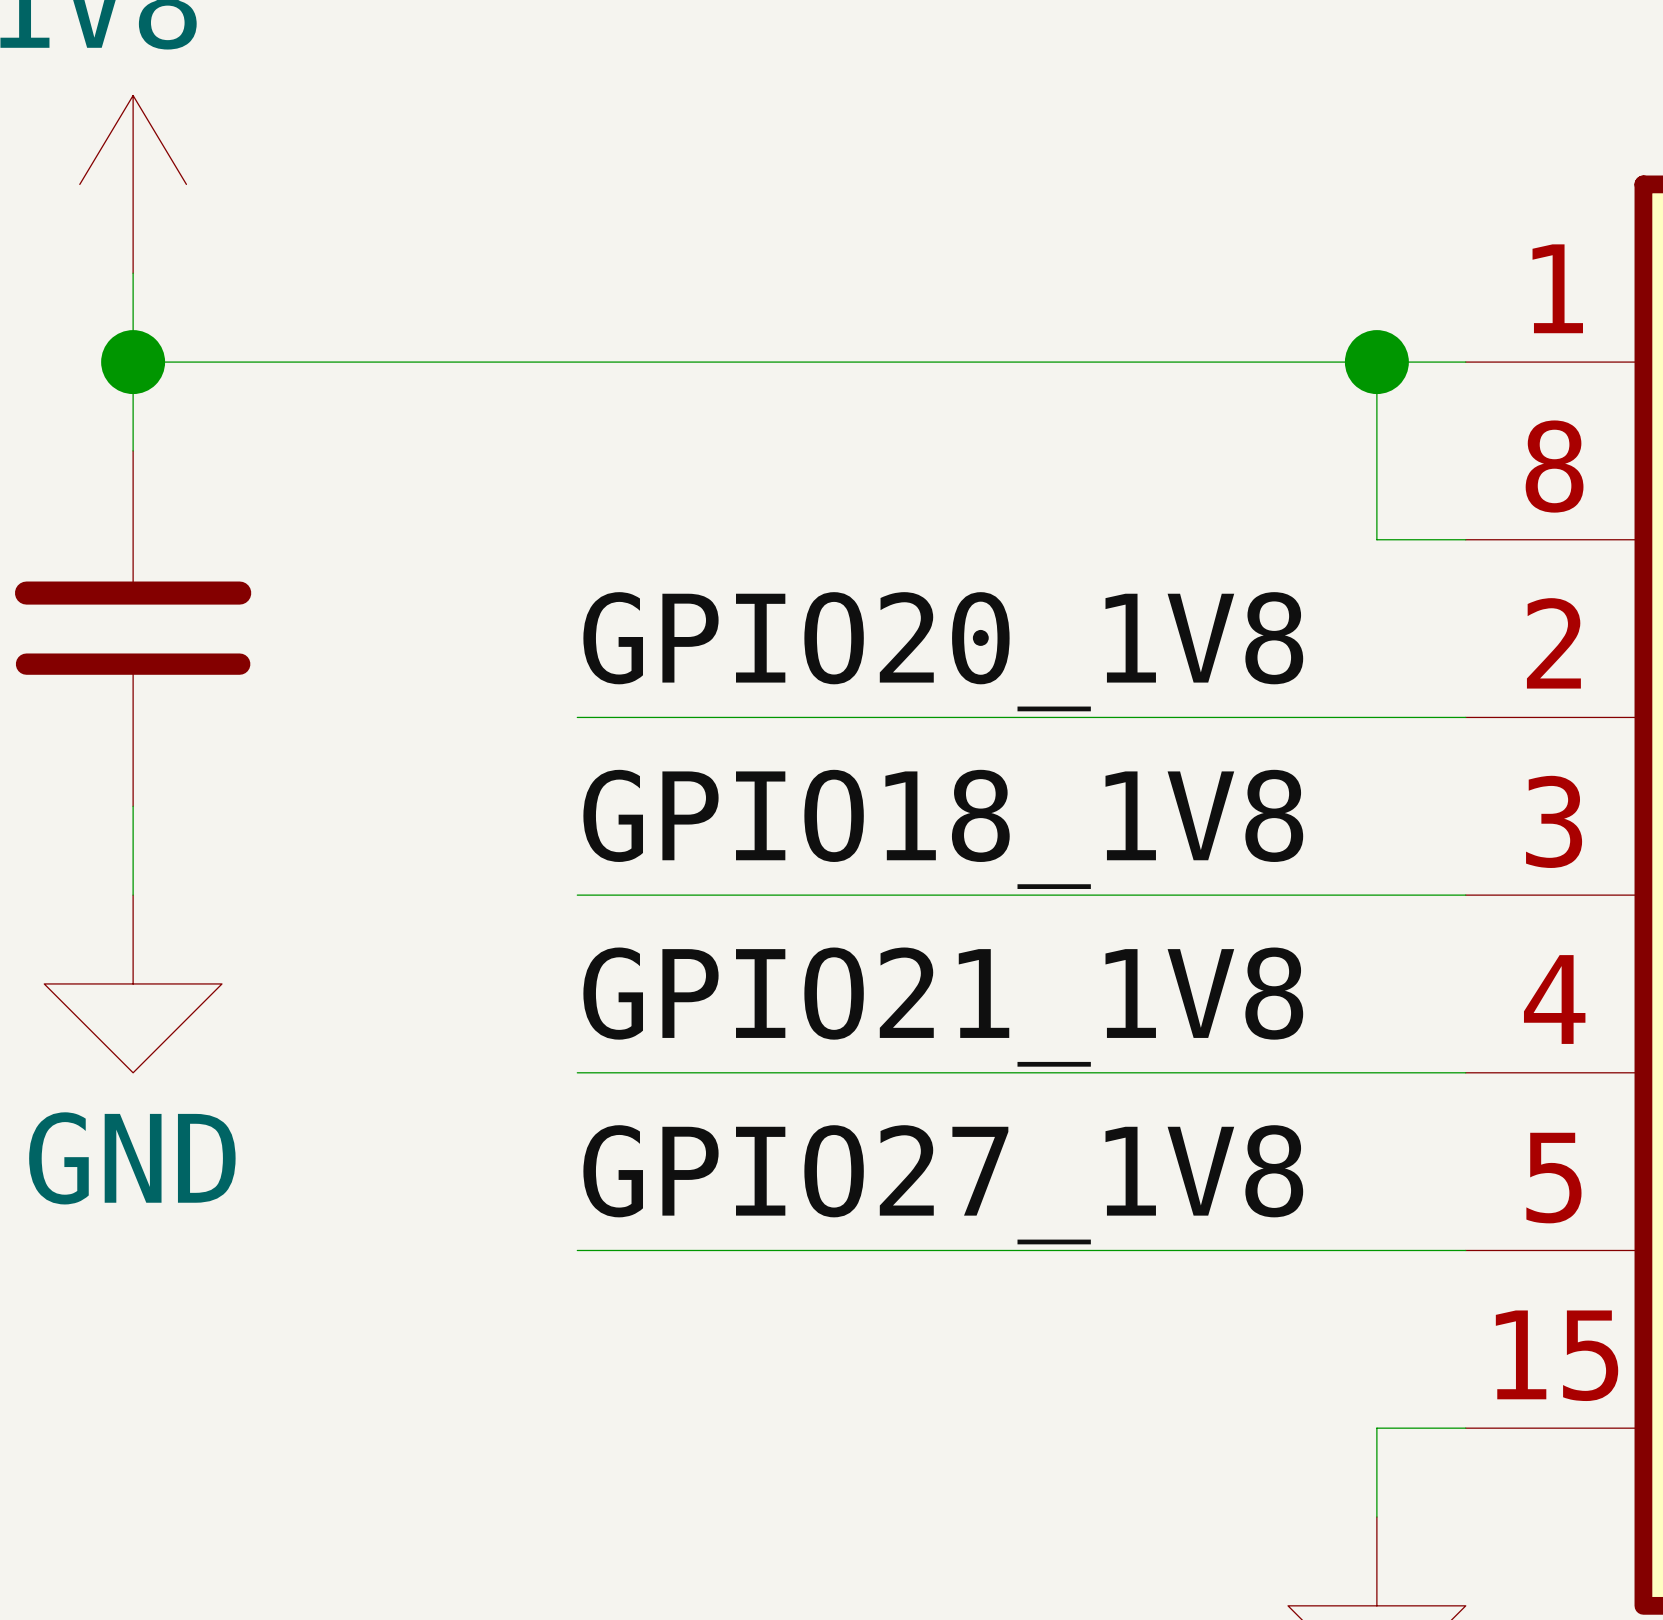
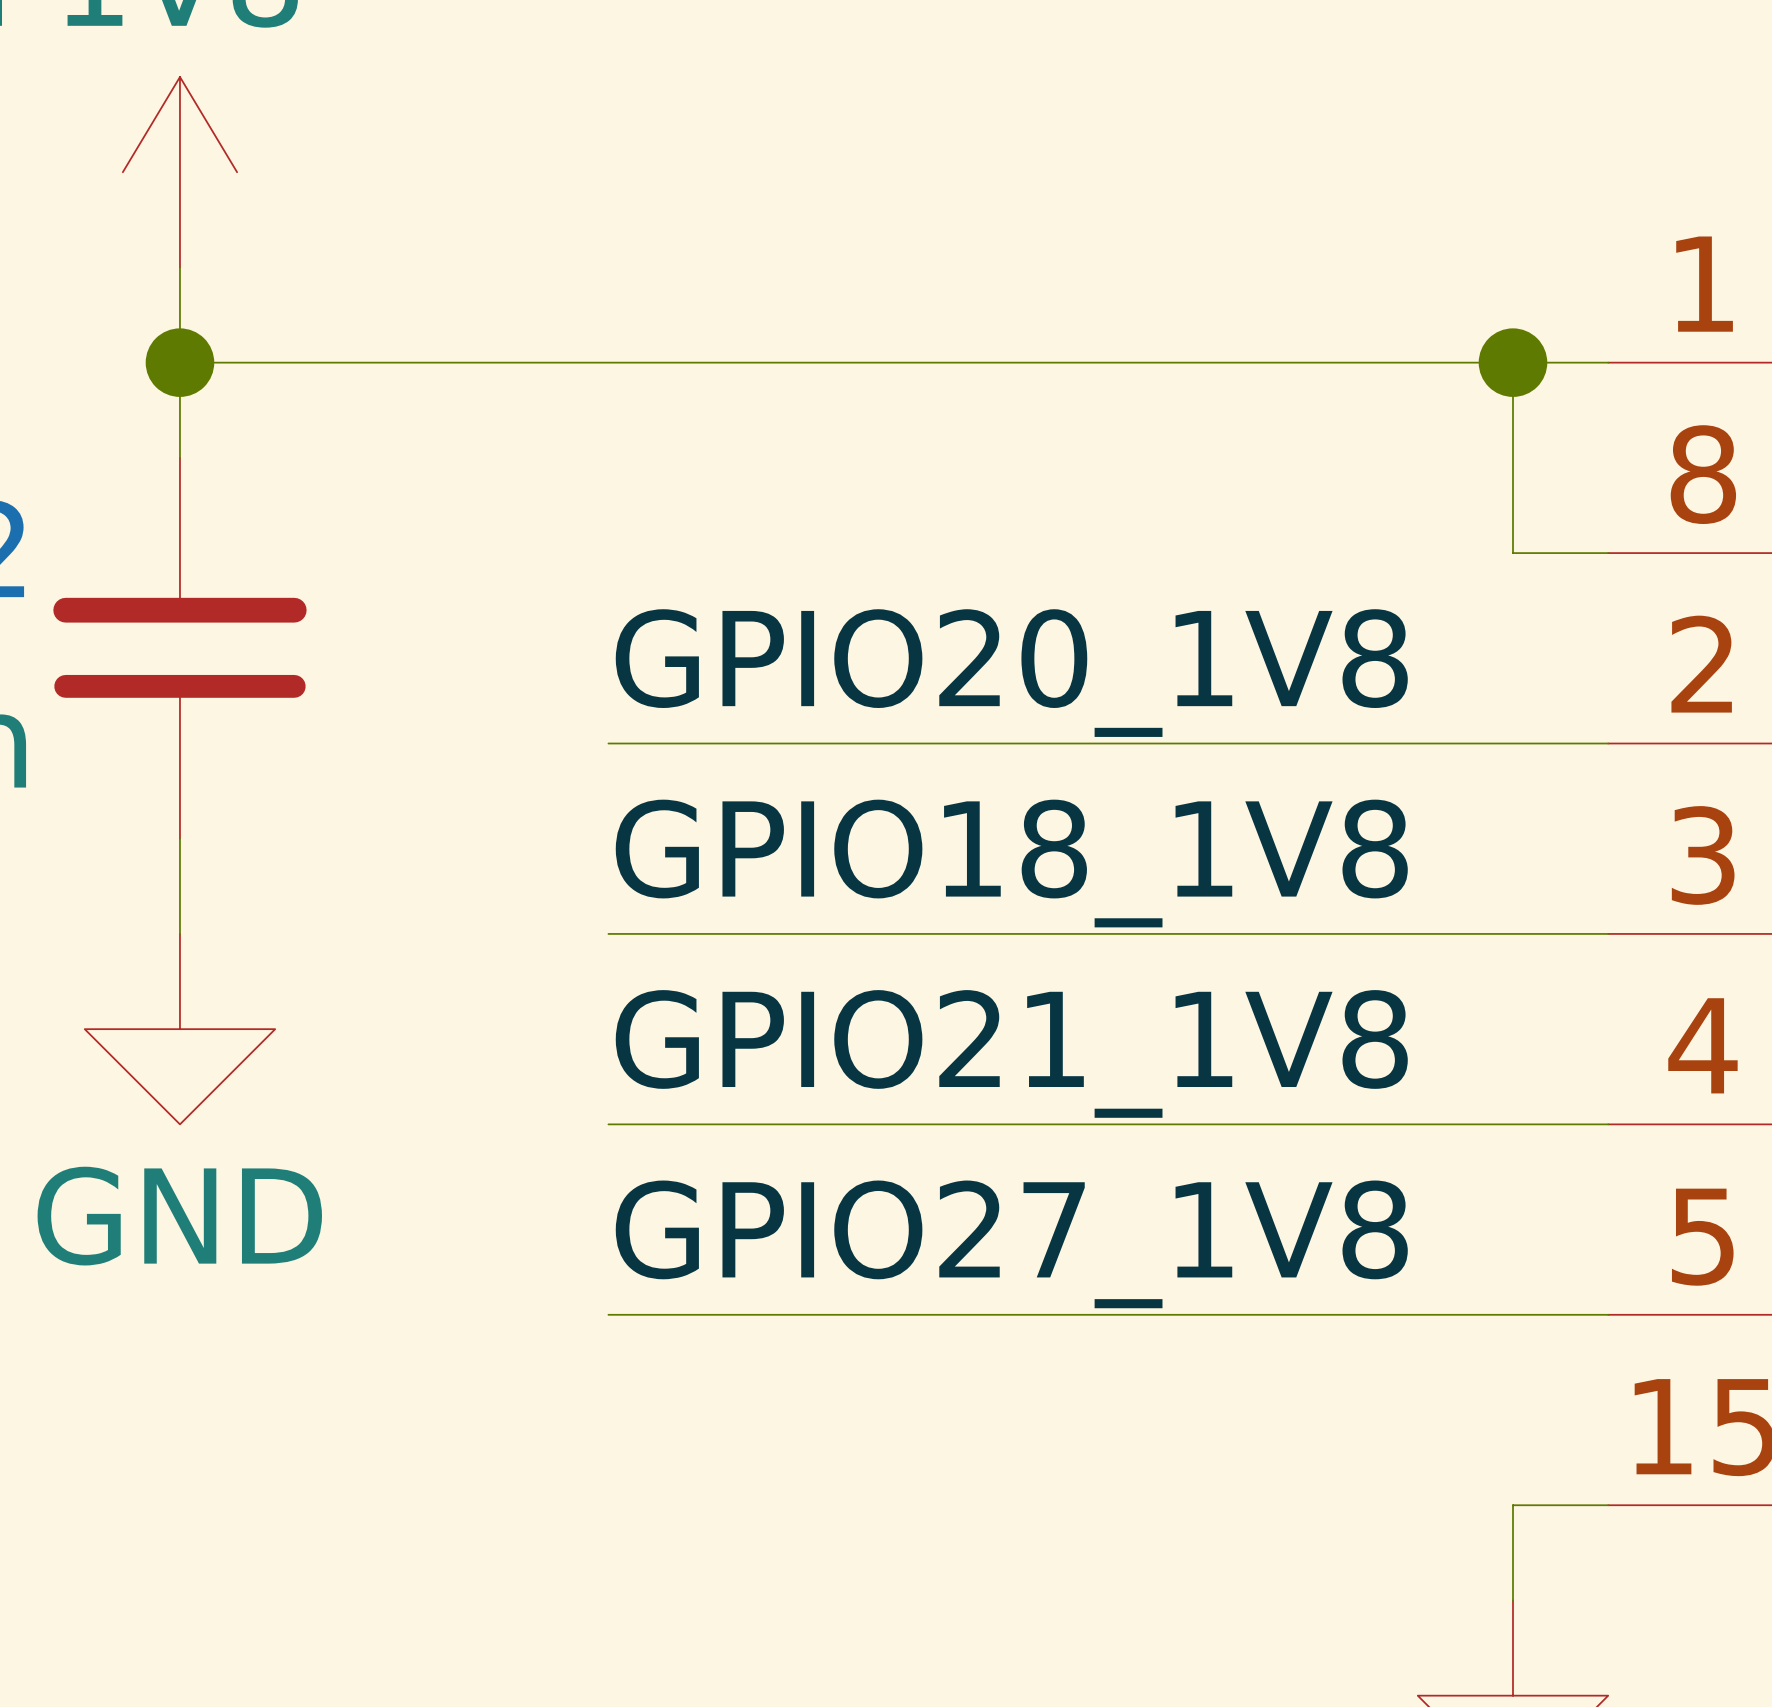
label position: GPIO20_1V8 (943, 651) -> GPIO20_1V8 (1011, 673)
wire: none -> (608, 743) (656, 743)
label position: GPIO18_1V8 (943, 829) -> GPIO18_1V8 (1011, 863)
wire: none -> (608, 933) (656, 933)
label position: GPIO21_1V8 (943, 1007) -> GPIO21_1V8 (1011, 1053)
wire: none -> (608, 1124) (656, 1124)
label position: GPIO27_1V8 (943, 1184) -> GPIO27_1V8 (1011, 1244)
wire: none -> (608, 1314) (656, 1314)

